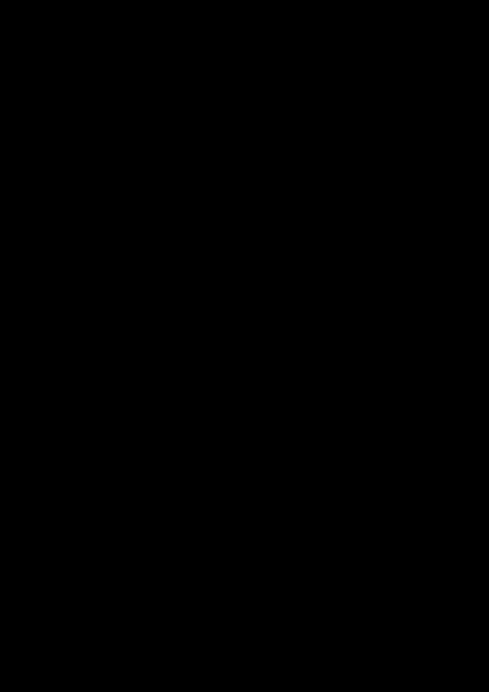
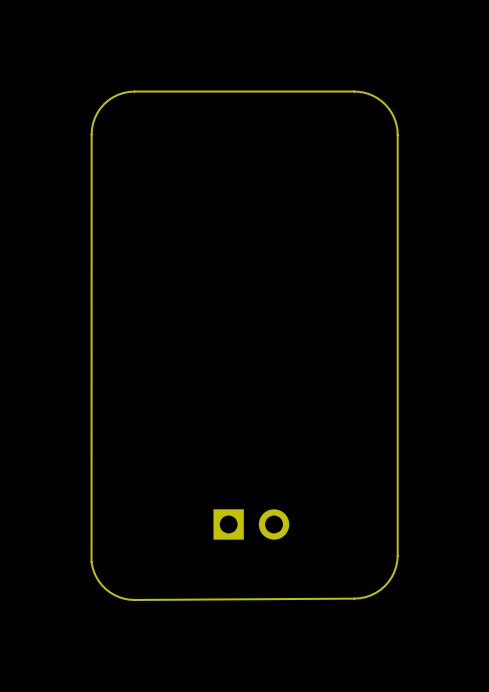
board edge: none -> (354, 91) (128, 91) (108, 100) (94, 118) (91, 134) (91, 562) (98, 581) (114, 595) (134, 599) (359, 598) (380, 589) (394, 572) (397, 555) (397, 130) (393, 116) (385, 104) (368, 93) (354, 91)
part: none -> (251, 524)

